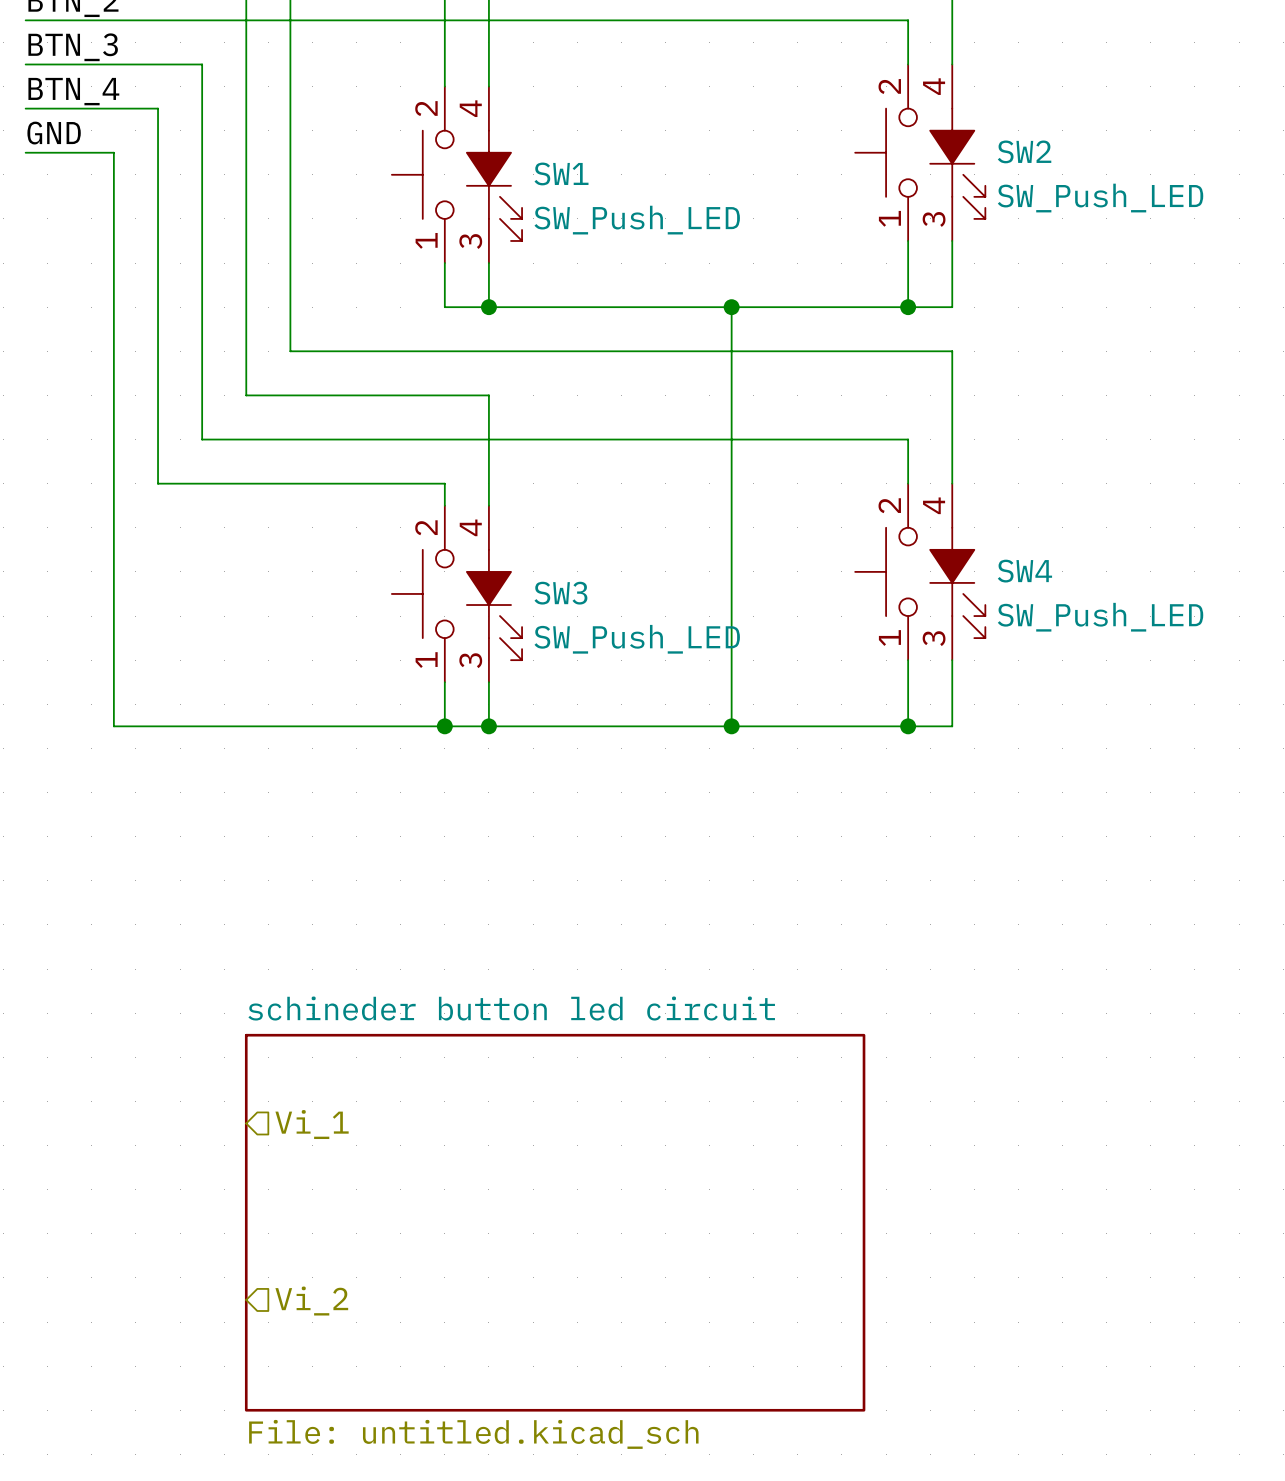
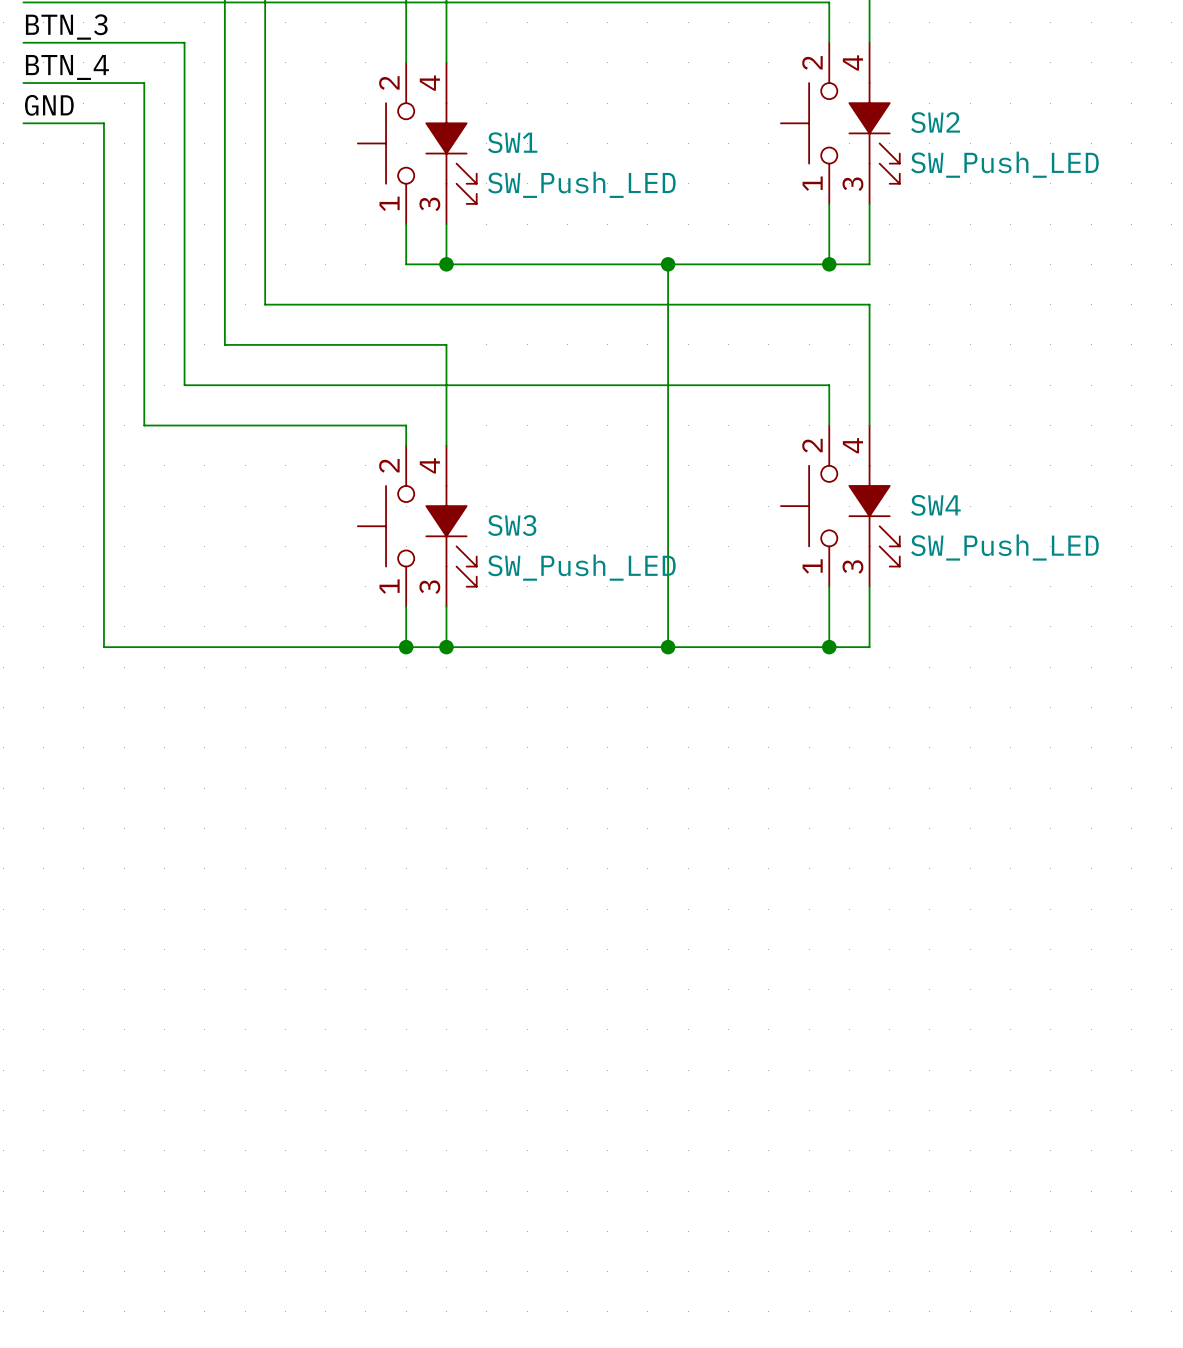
hierarchical label: Vi_1 (312, 1124) -> none
sheet schineder button led circuit: File: untitled.kicad_sch (555, 1222) -> none
hierarchical label: Vi_2 (311, 1301) -> none

